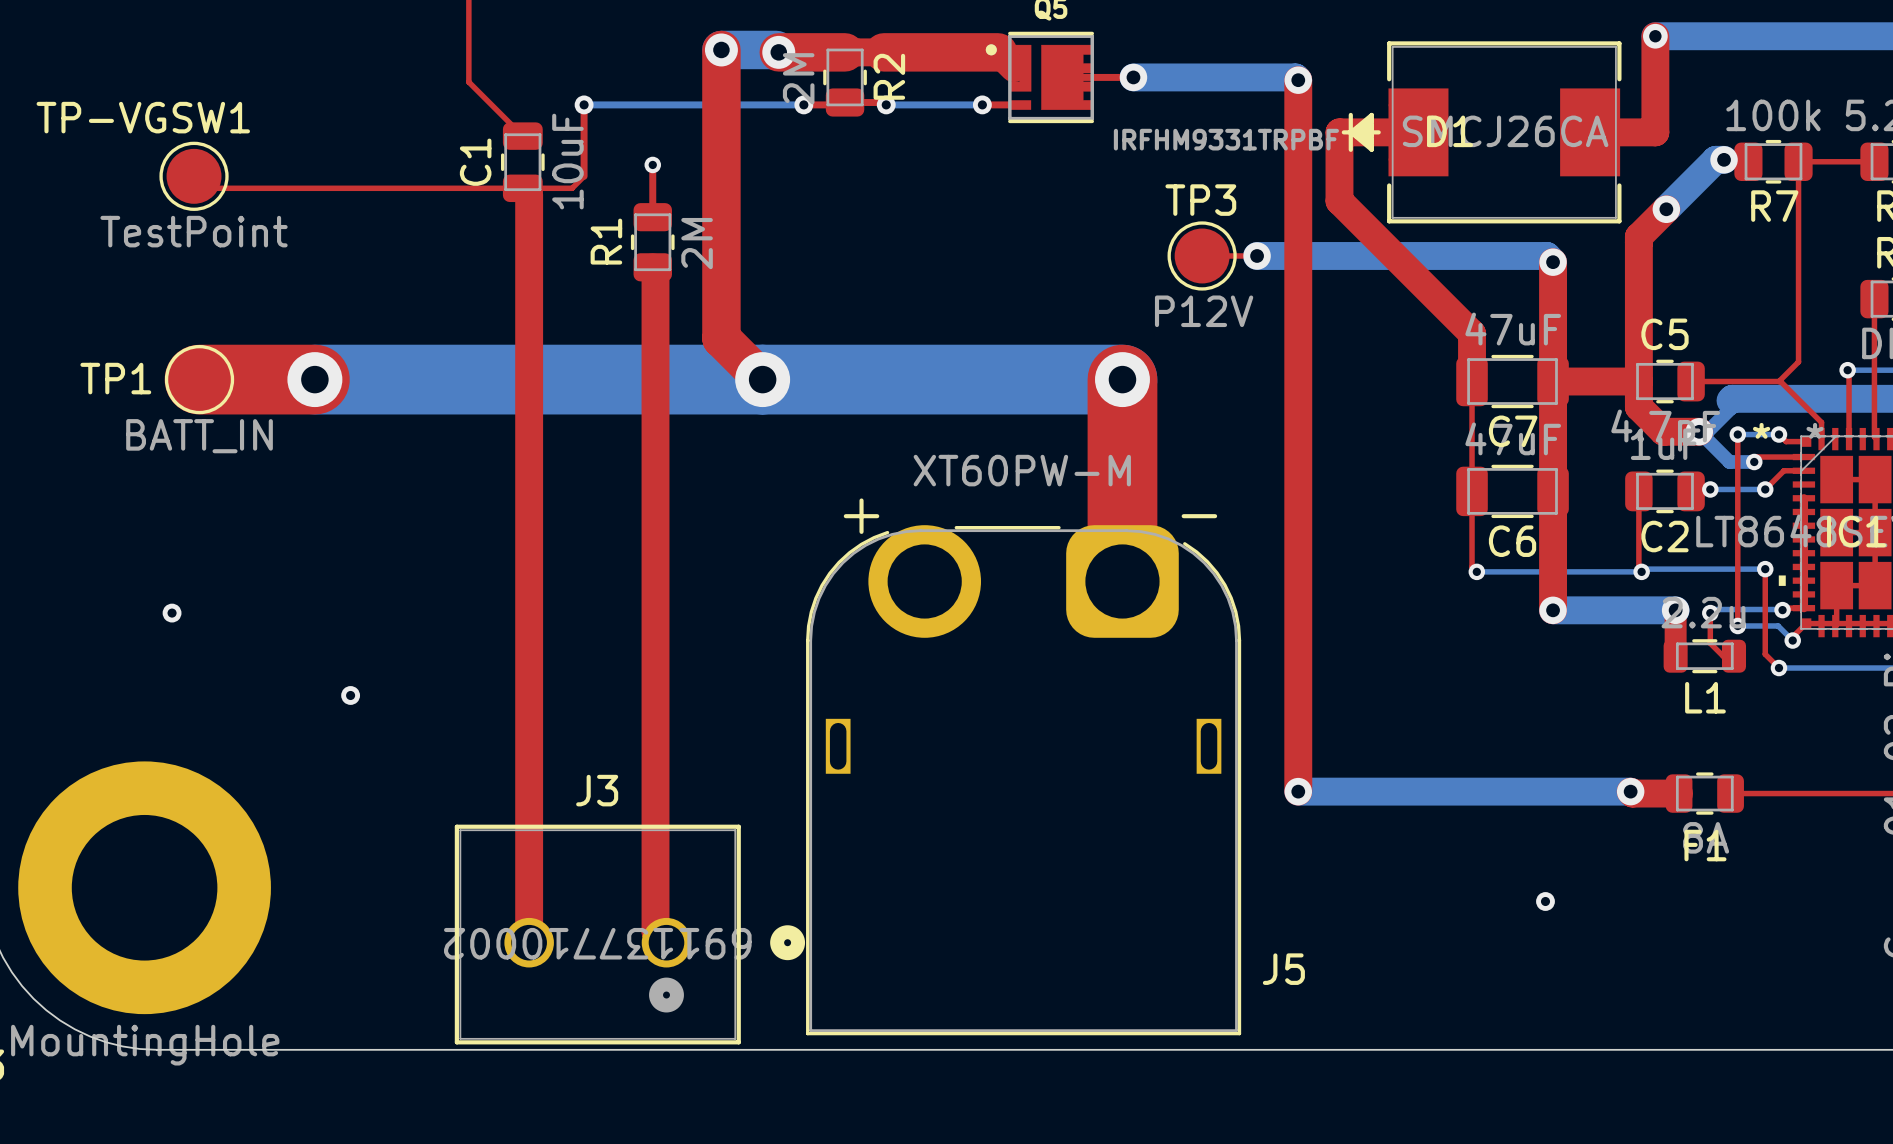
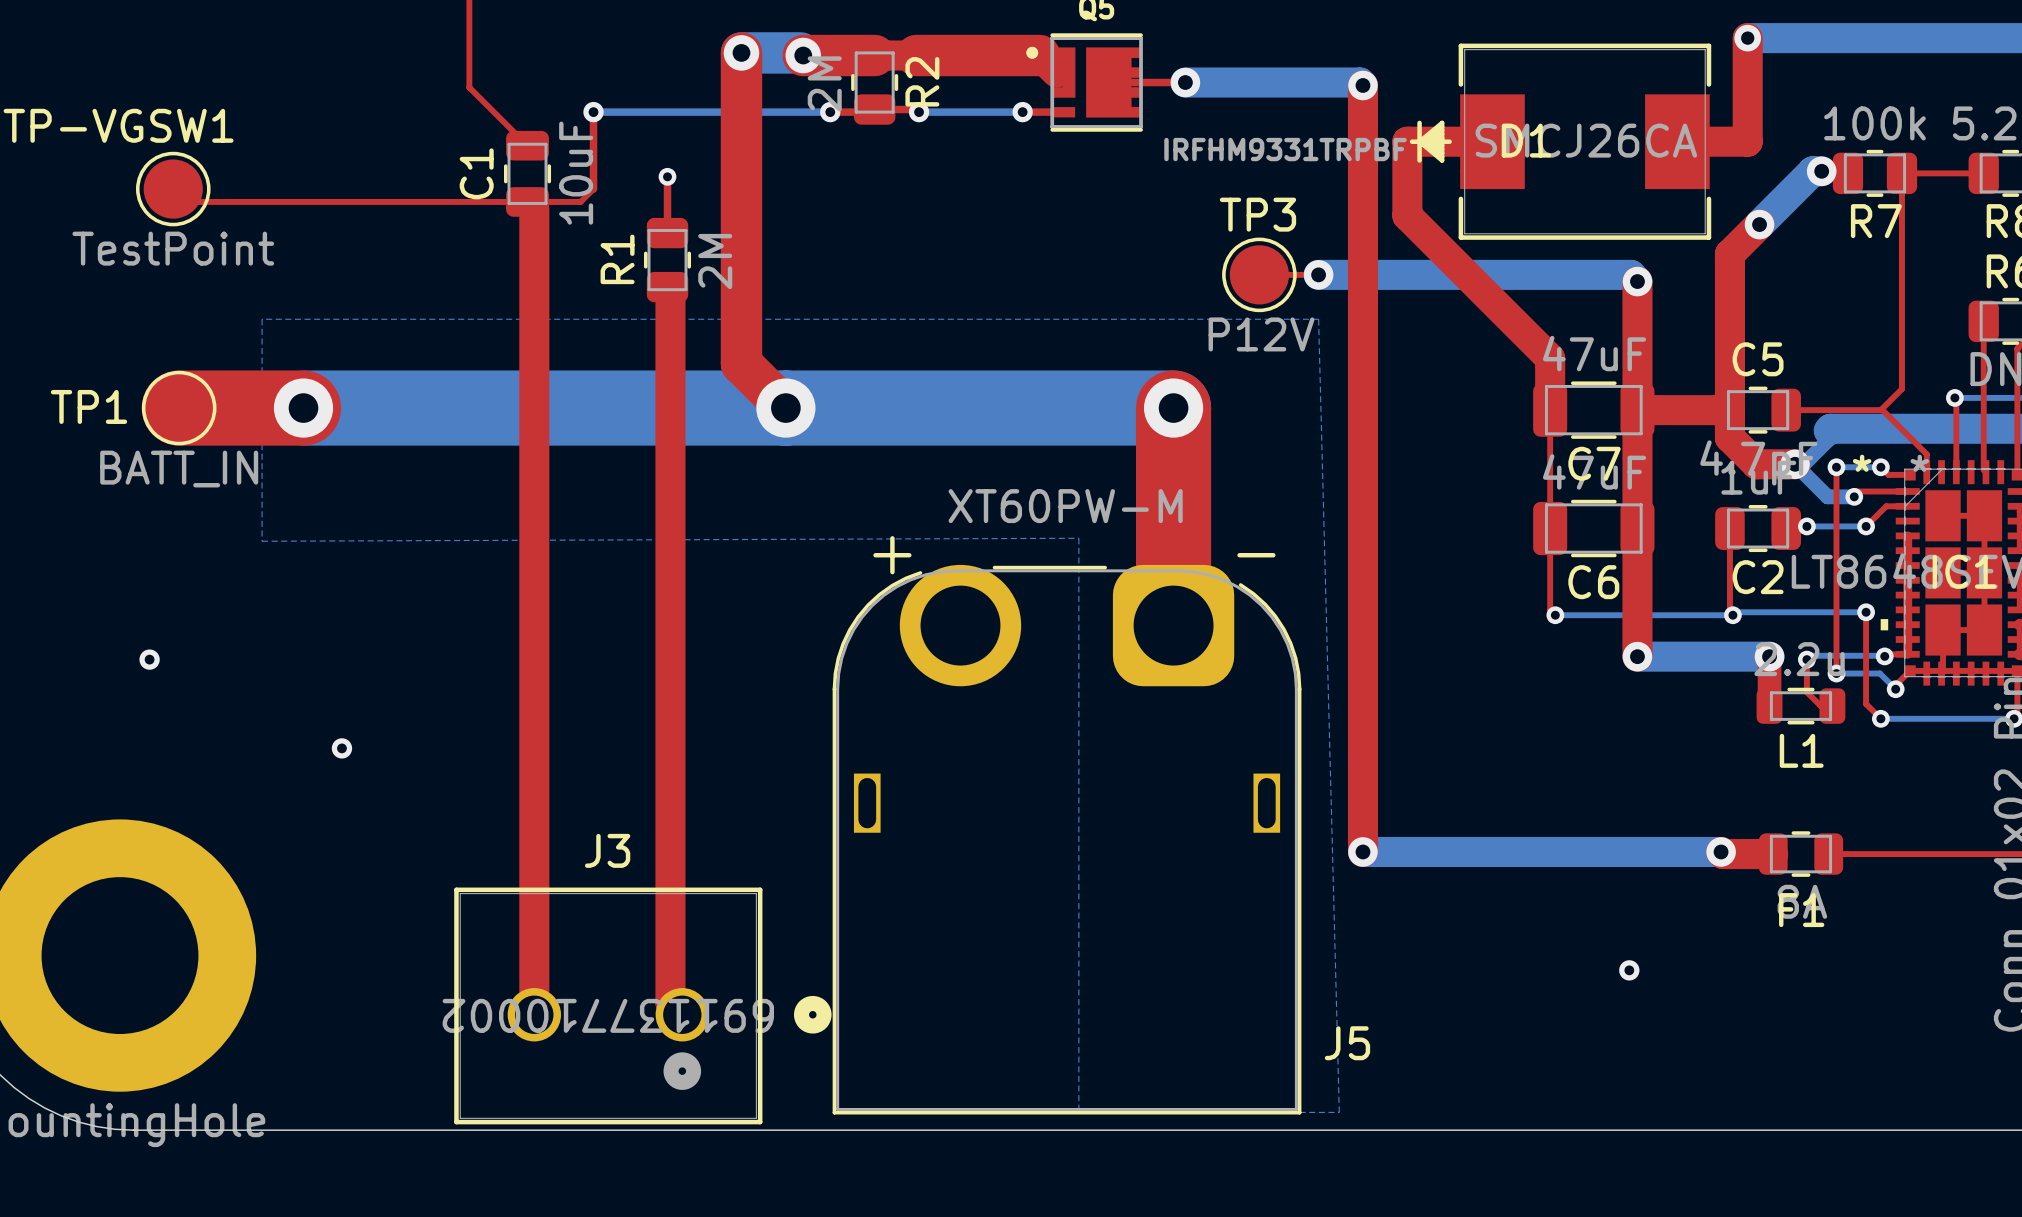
bottom zone outline: none -> (262, 319) (262, 541) (1078, 538) (1078, 1112) (1339, 1112) (1318, 319) (262, 319)

